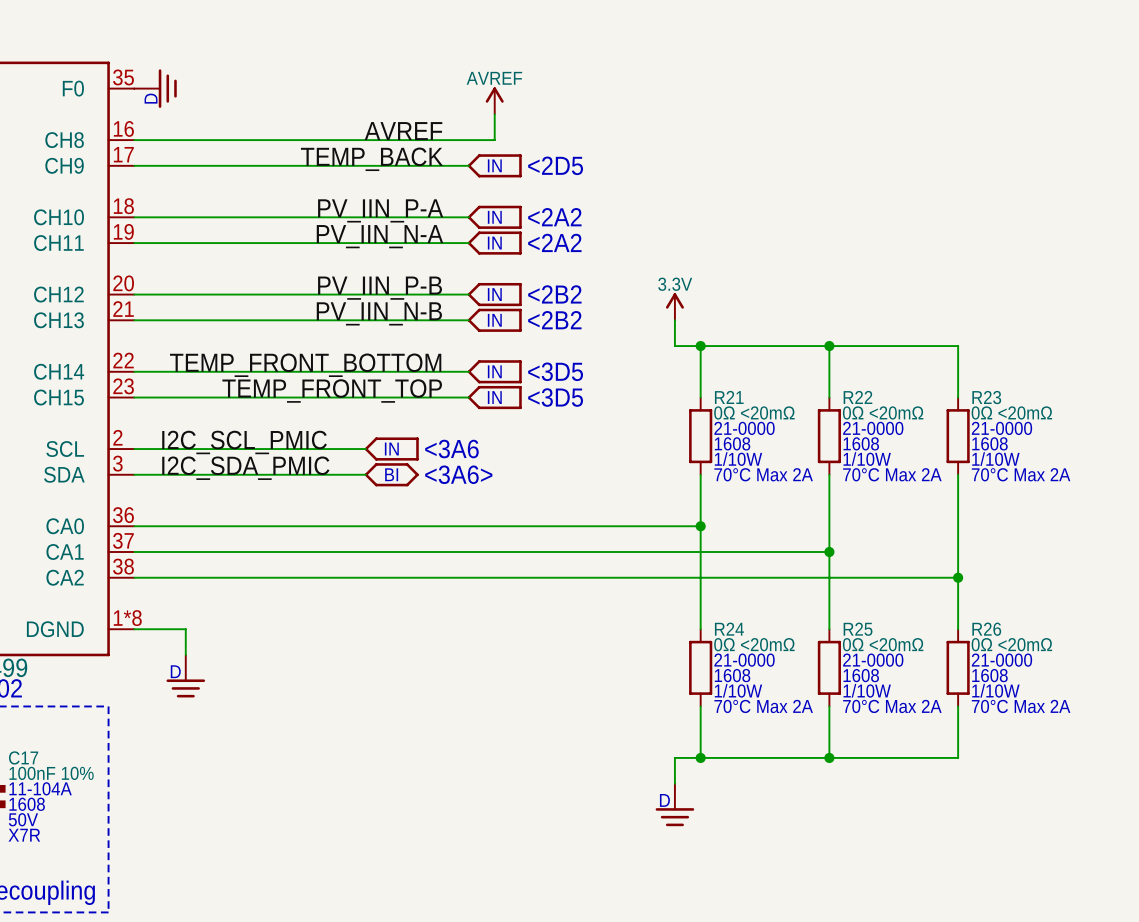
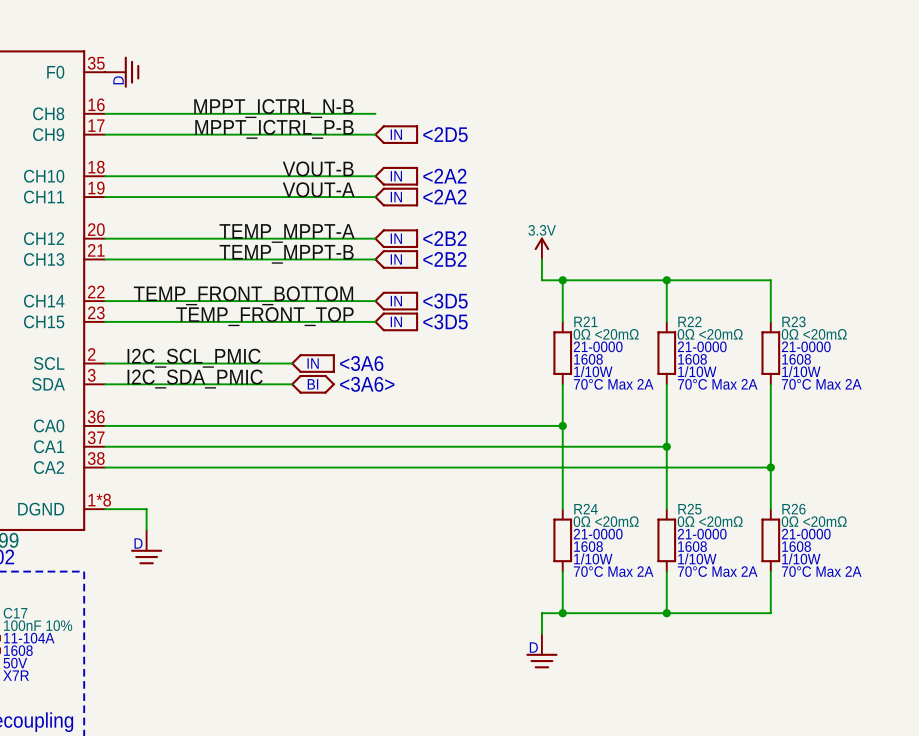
power symbol: AVREF (494, 100) -> none
wire: (494, 114) (494, 140) (468, 140) -> none
label: AVREF (403, 131) -> MPPT_ICTRL_N-B (273, 108)
label: TEMP_BACK (371, 159) -> MPPT_ICTRL_P-B (274, 129)
label: PV_IIN_P-A (380, 210) -> VOUT-B (318, 168)
label: PV_IIN_N-A (379, 236) -> VOUT-A (318, 189)
label: PV_IIN_P-B (380, 288) -> TEMP_MPPT-A (287, 233)
label: PV_IIN_N-B (379, 313) -> TEMP_MPPT-B (286, 254)

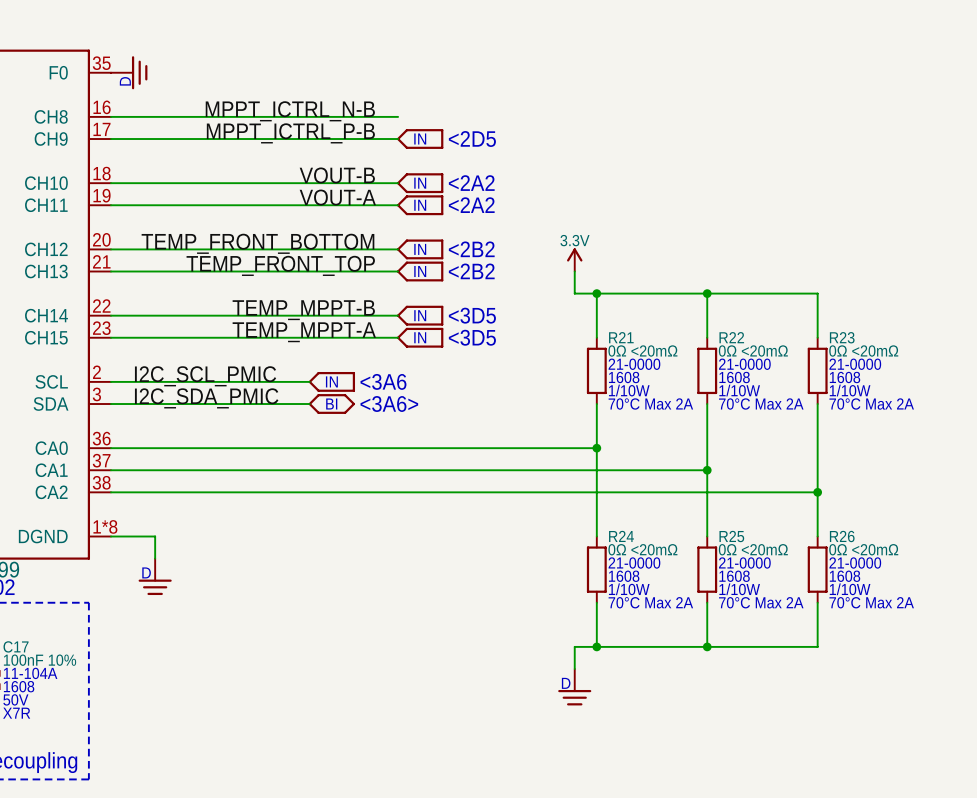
label: TEMP_MPPT-A (287, 233) -> TEMP_FRONT_BOTTOM (257, 243)
label: TEMP_MPPT-B (286, 254) -> TEMP_FRONT_TOP (280, 265)
label: TEMP_FRONT_BOTTOM (243, 295) -> TEMP_MPPT-B (303, 310)
label: TEMP_FRONT_TOP (264, 316) -> TEMP_MPPT-A (304, 332)

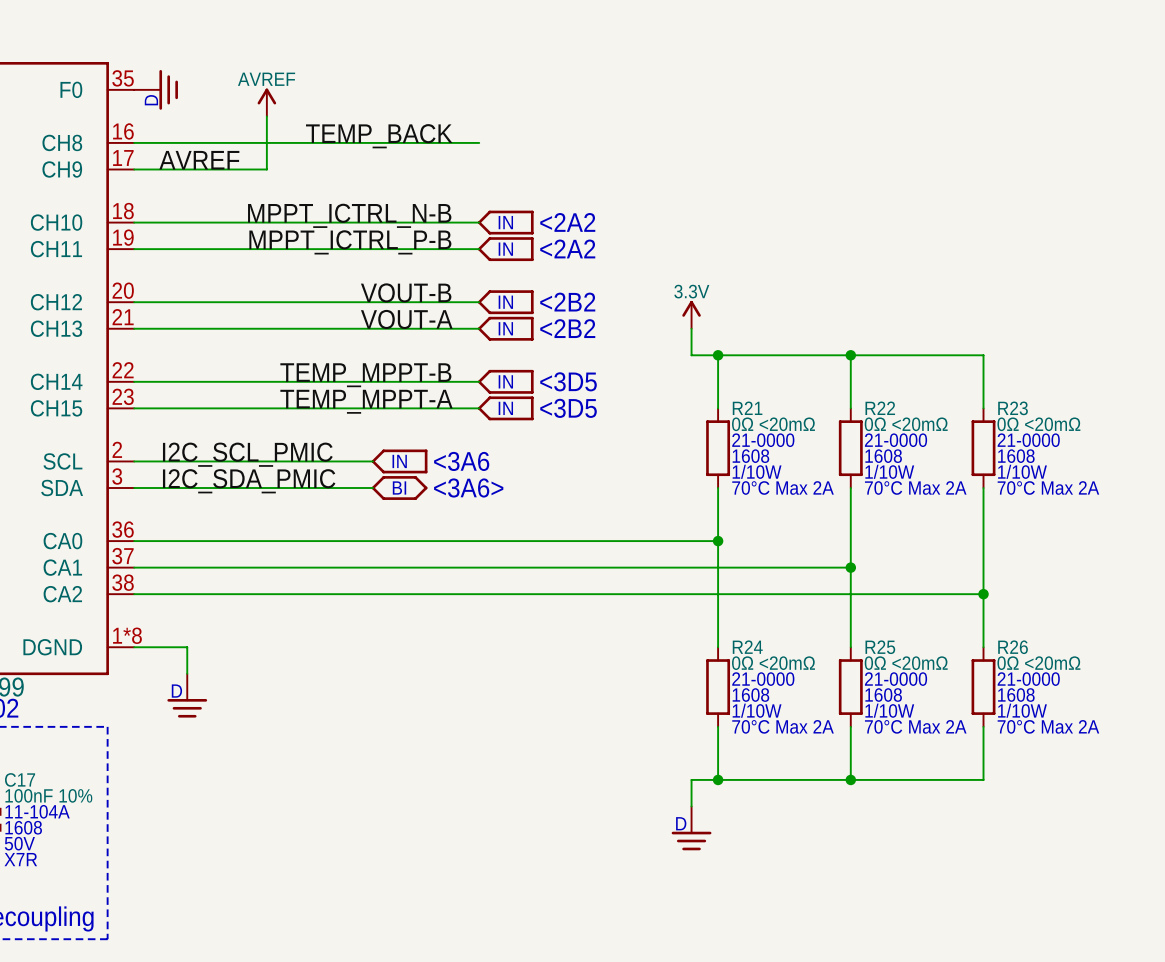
power symbol: none -> AVREF (266, 102)
label: MPPT_ICTRL_N-B (290, 111) -> TEMP_BACK (379, 136)
label: none -> AVREF (199, 160)
label: MPPT_ICTRL_P-B (290, 133) -> none
text: <2D5 (472, 138) -> none
wire: (221, 139) (398, 139) -> (266, 169) (266, 116)
part: (420, 139) -> none
label: VOUT-B (337, 175) -> MPPT_ICTRL_N-B (349, 215)
label: VOUT-A (337, 197) -> MPPT_ICTRL_P-B (350, 242)
label: TEMP_FRONT_BOTTOM (257, 243) -> VOUT-B (406, 292)
label: TEMP_FRONT_TOP (280, 265) -> VOUT-A (406, 319)

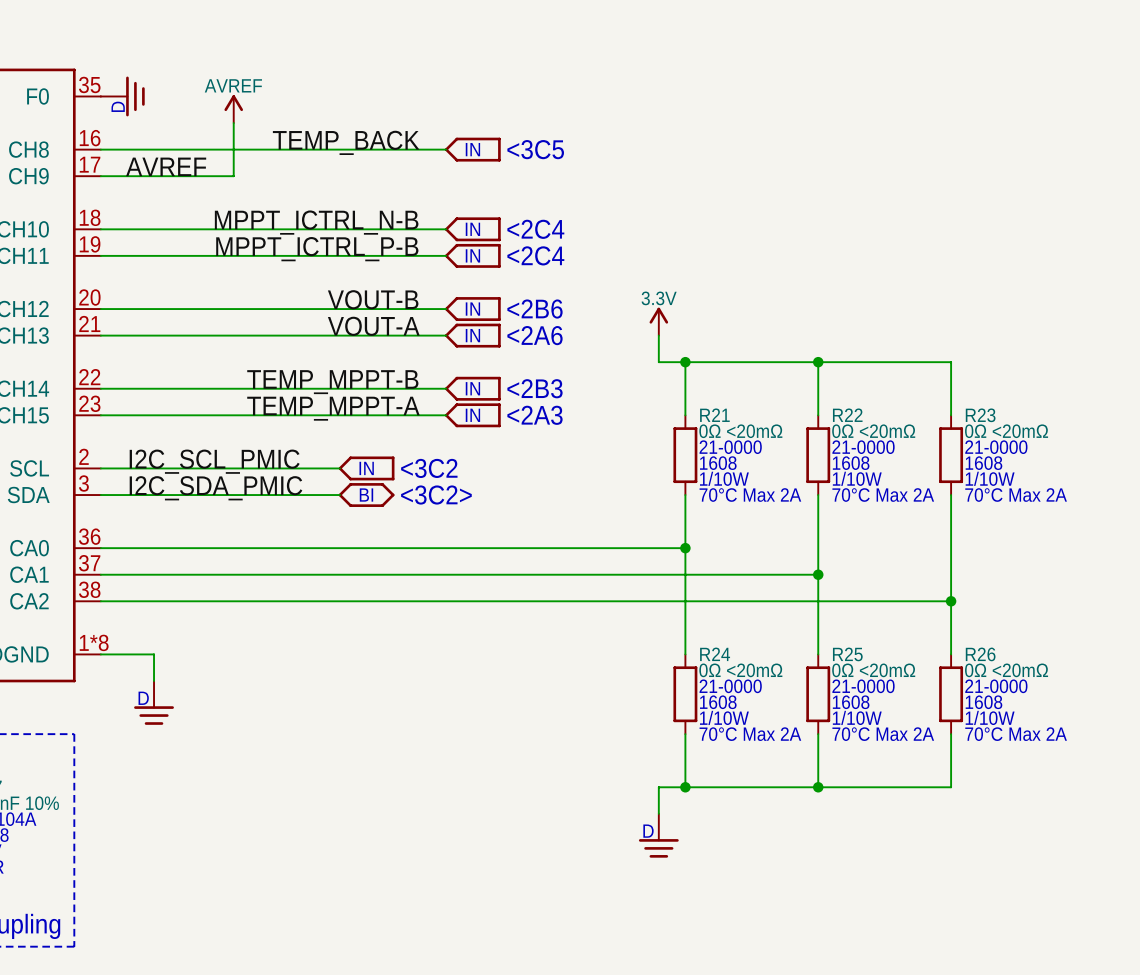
part: none -> (472, 149)
text: none -> <3C5 (535, 149)
text: <2A2 (567, 222) -> <2C4 (535, 229)
text: <2A2 (567, 248) -> <2C4 (535, 255)
text: <2B2 (567, 302) -> <2B6 (534, 309)
text: <2B2 (567, 328) -> <2A6 (534, 335)
text: <3D5 (568, 381) -> <2B3 (534, 388)
text: <3D5 (568, 408) -> <2A3 (534, 415)
text: <3A6 (461, 461) -> <3C2 (429, 468)
text: <3A6> (468, 487) -> <3C2> (436, 495)

